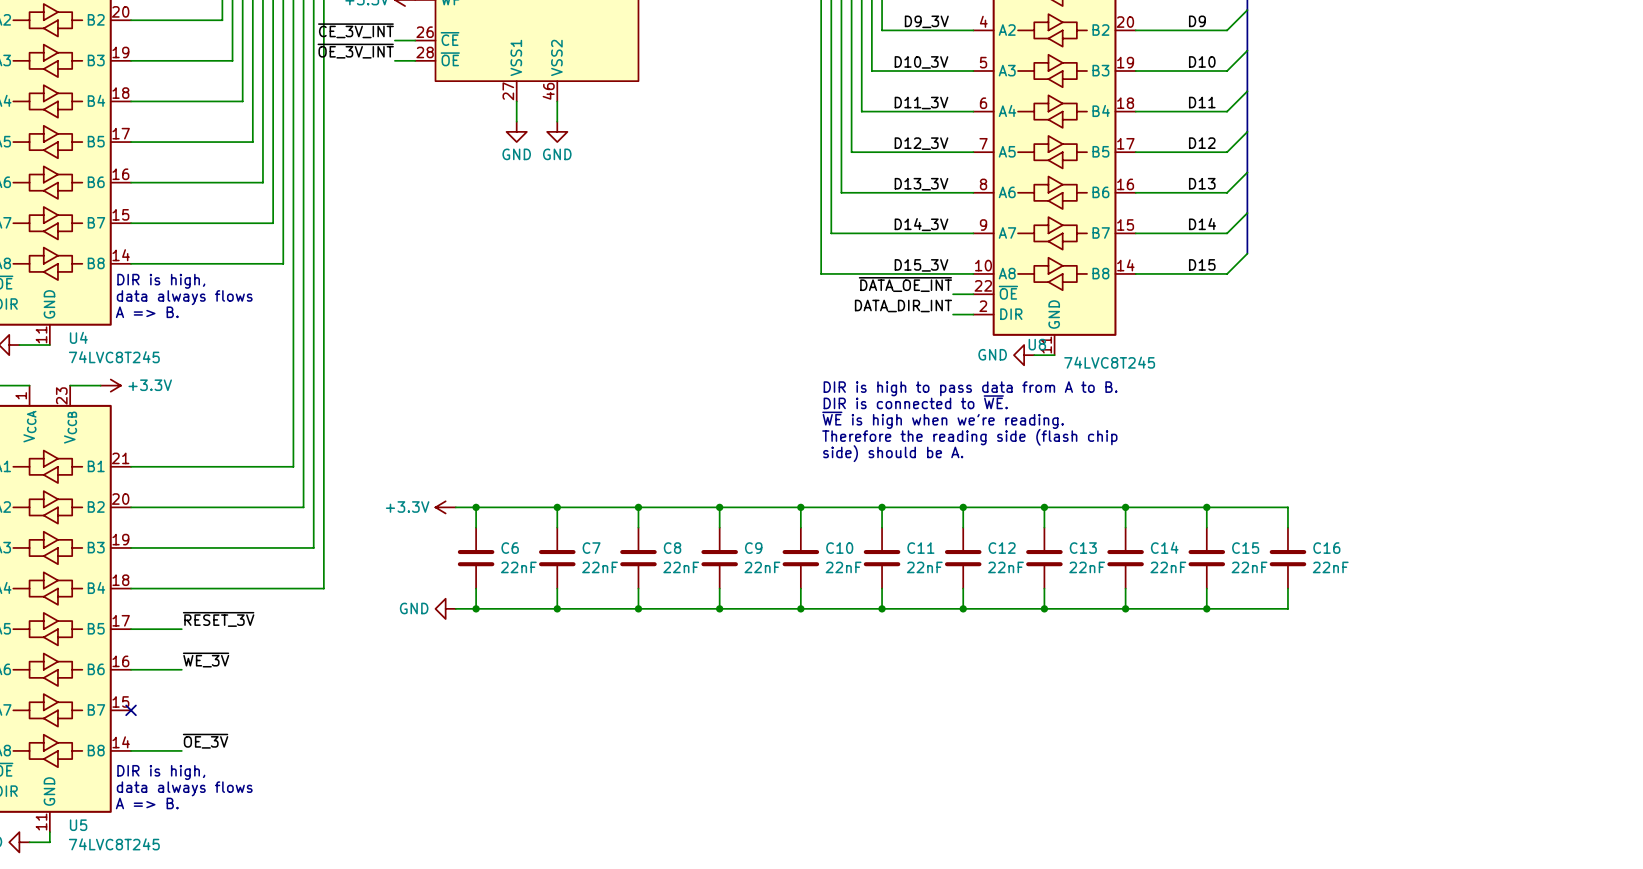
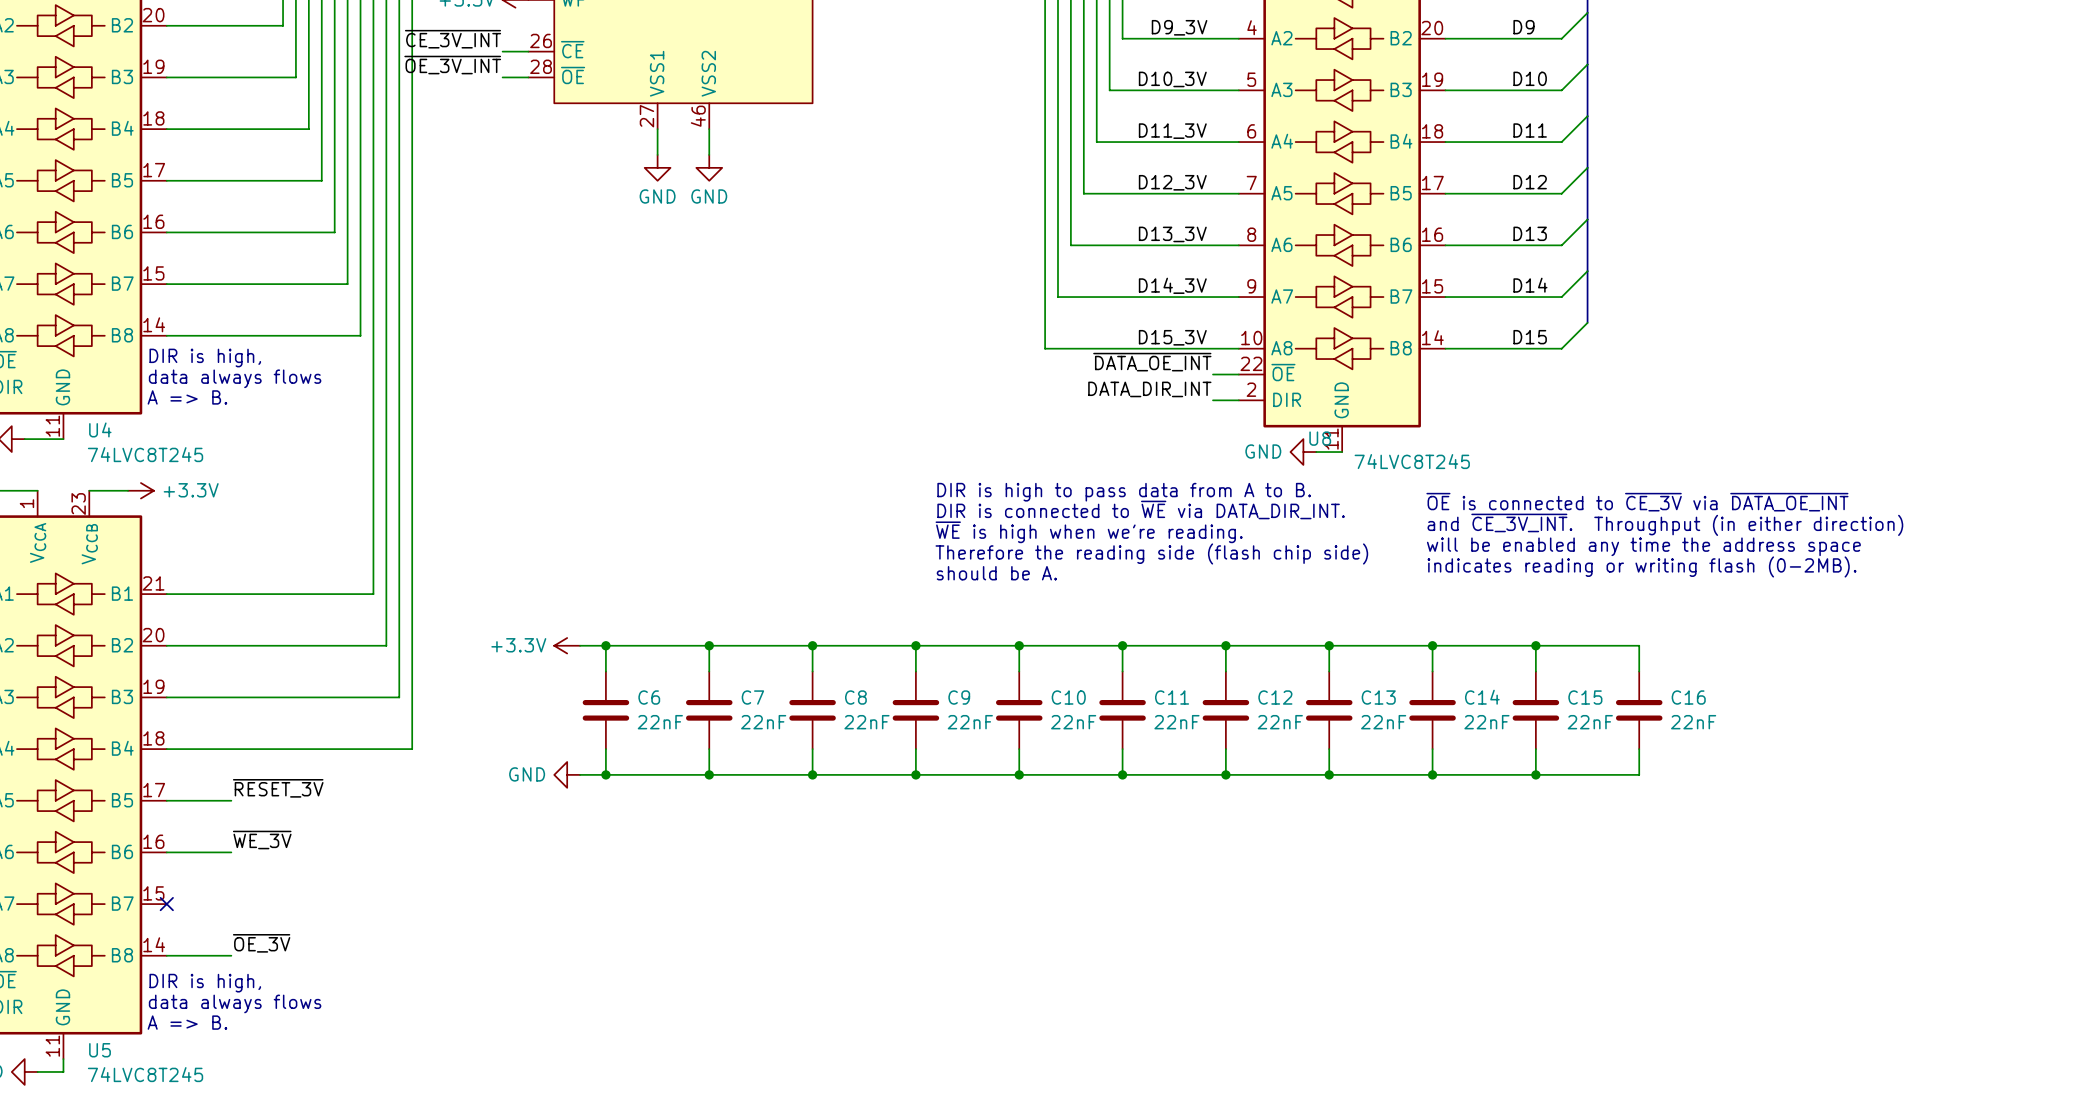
text position: DIR is high to pass data from A to B. (970, 388) -> DIR is high to pass data from A to B. (1124, 492)
text: none -> ~{OE} is connected to ~{CE_3V} via ~{DATA_OE_INT} (1637, 502)
text: DIR is connected to ~{WE}. (915, 402) -> DIR is connected to ~{WE} via DATA_DIR_INT. (1141, 509)
text: none -> and ~{CE_3V_INT}. Throughput (in either direction) (1665, 524)
text position: ~{WE} is high when we're reading. (943, 420) -> ~{WE} is high when we're reading. (1089, 532)
text: none -> will be enabled any time the address space (1643, 546)
text: Therefore the reading side (flash chip (969, 437) -> Therefore the reading side (flash chip side) (1151, 553)
text: none -> indicates reading or writing flash (0-2MB). (1642, 566)
text: side) should be A. (893, 453) -> should be A. (996, 573)

